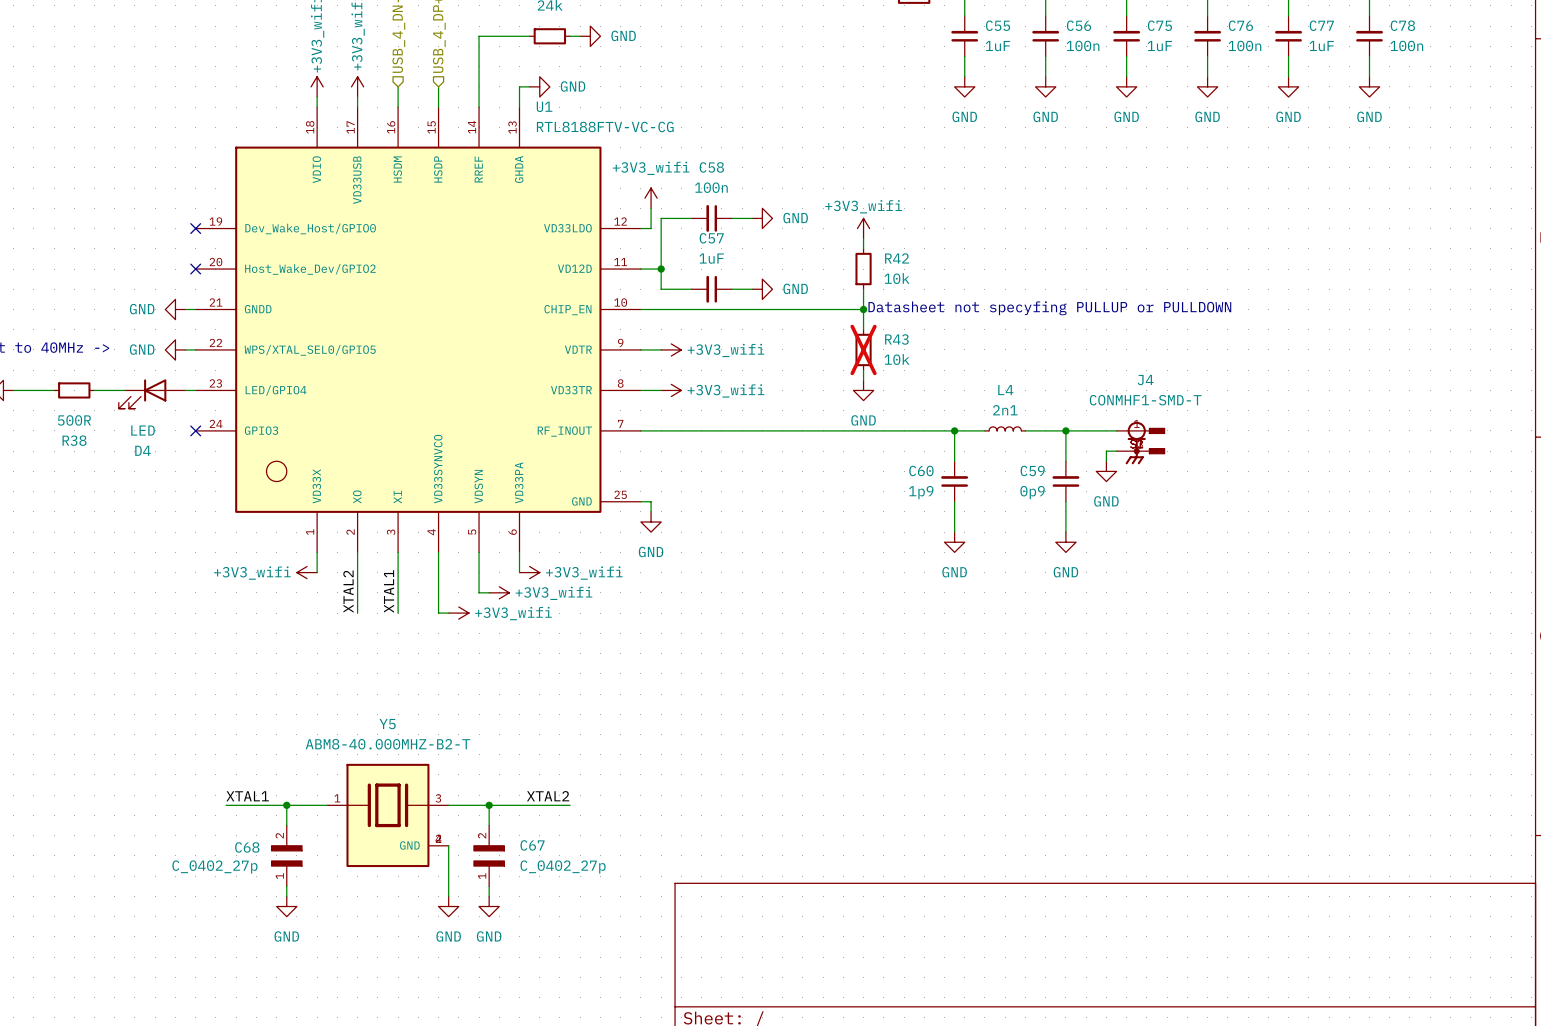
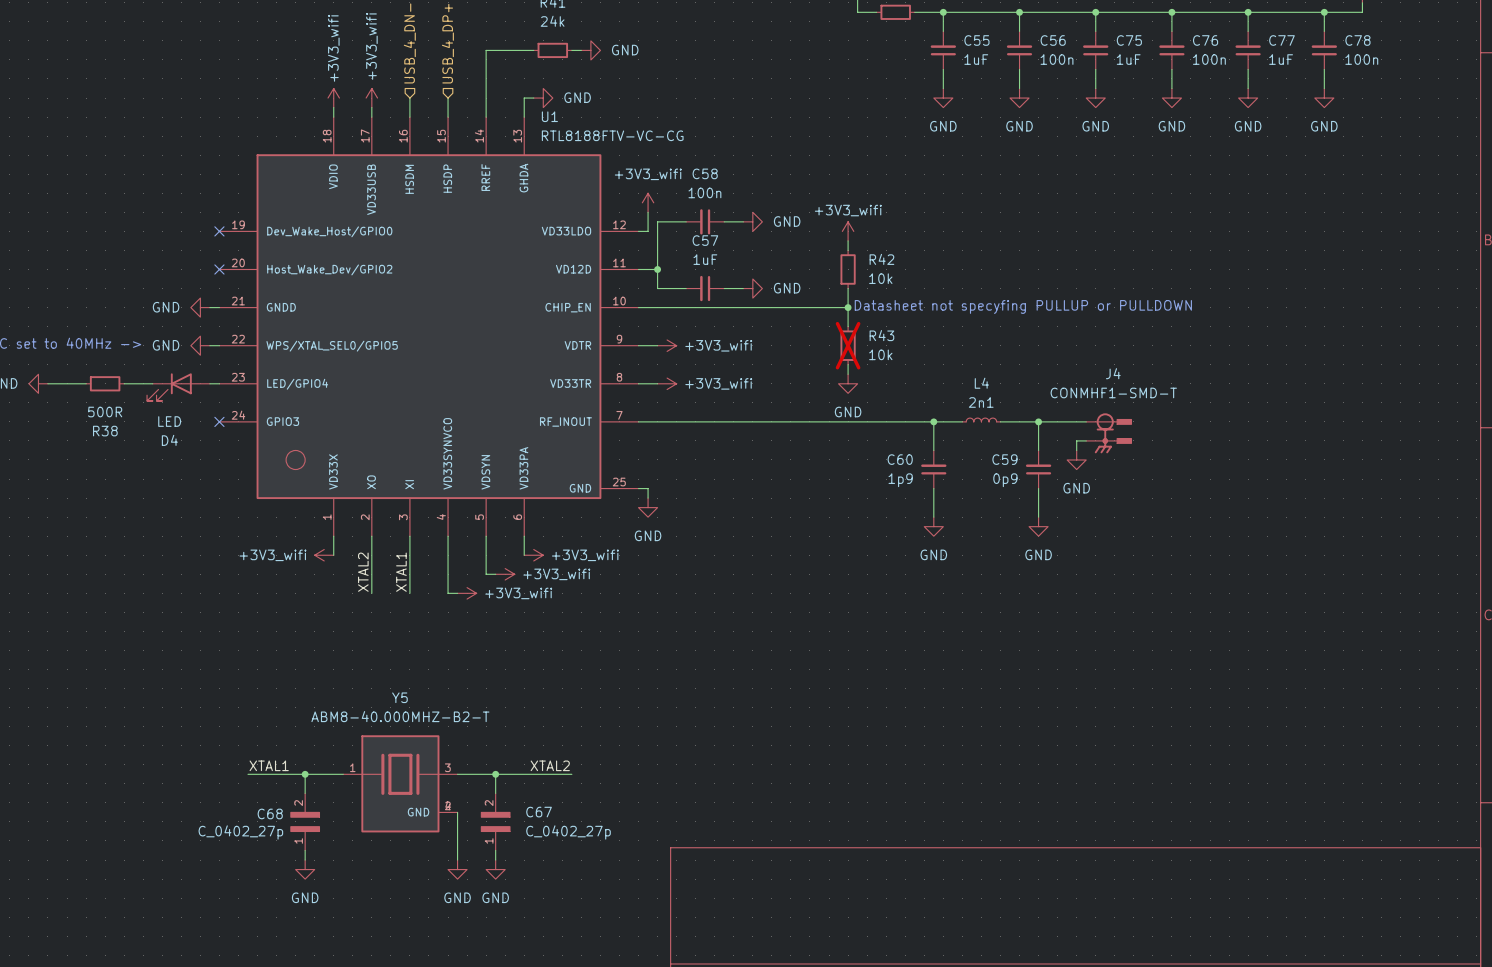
J4 symbol: [1116, 421, 1165, 465] -> [1086, 413, 1132, 454]

